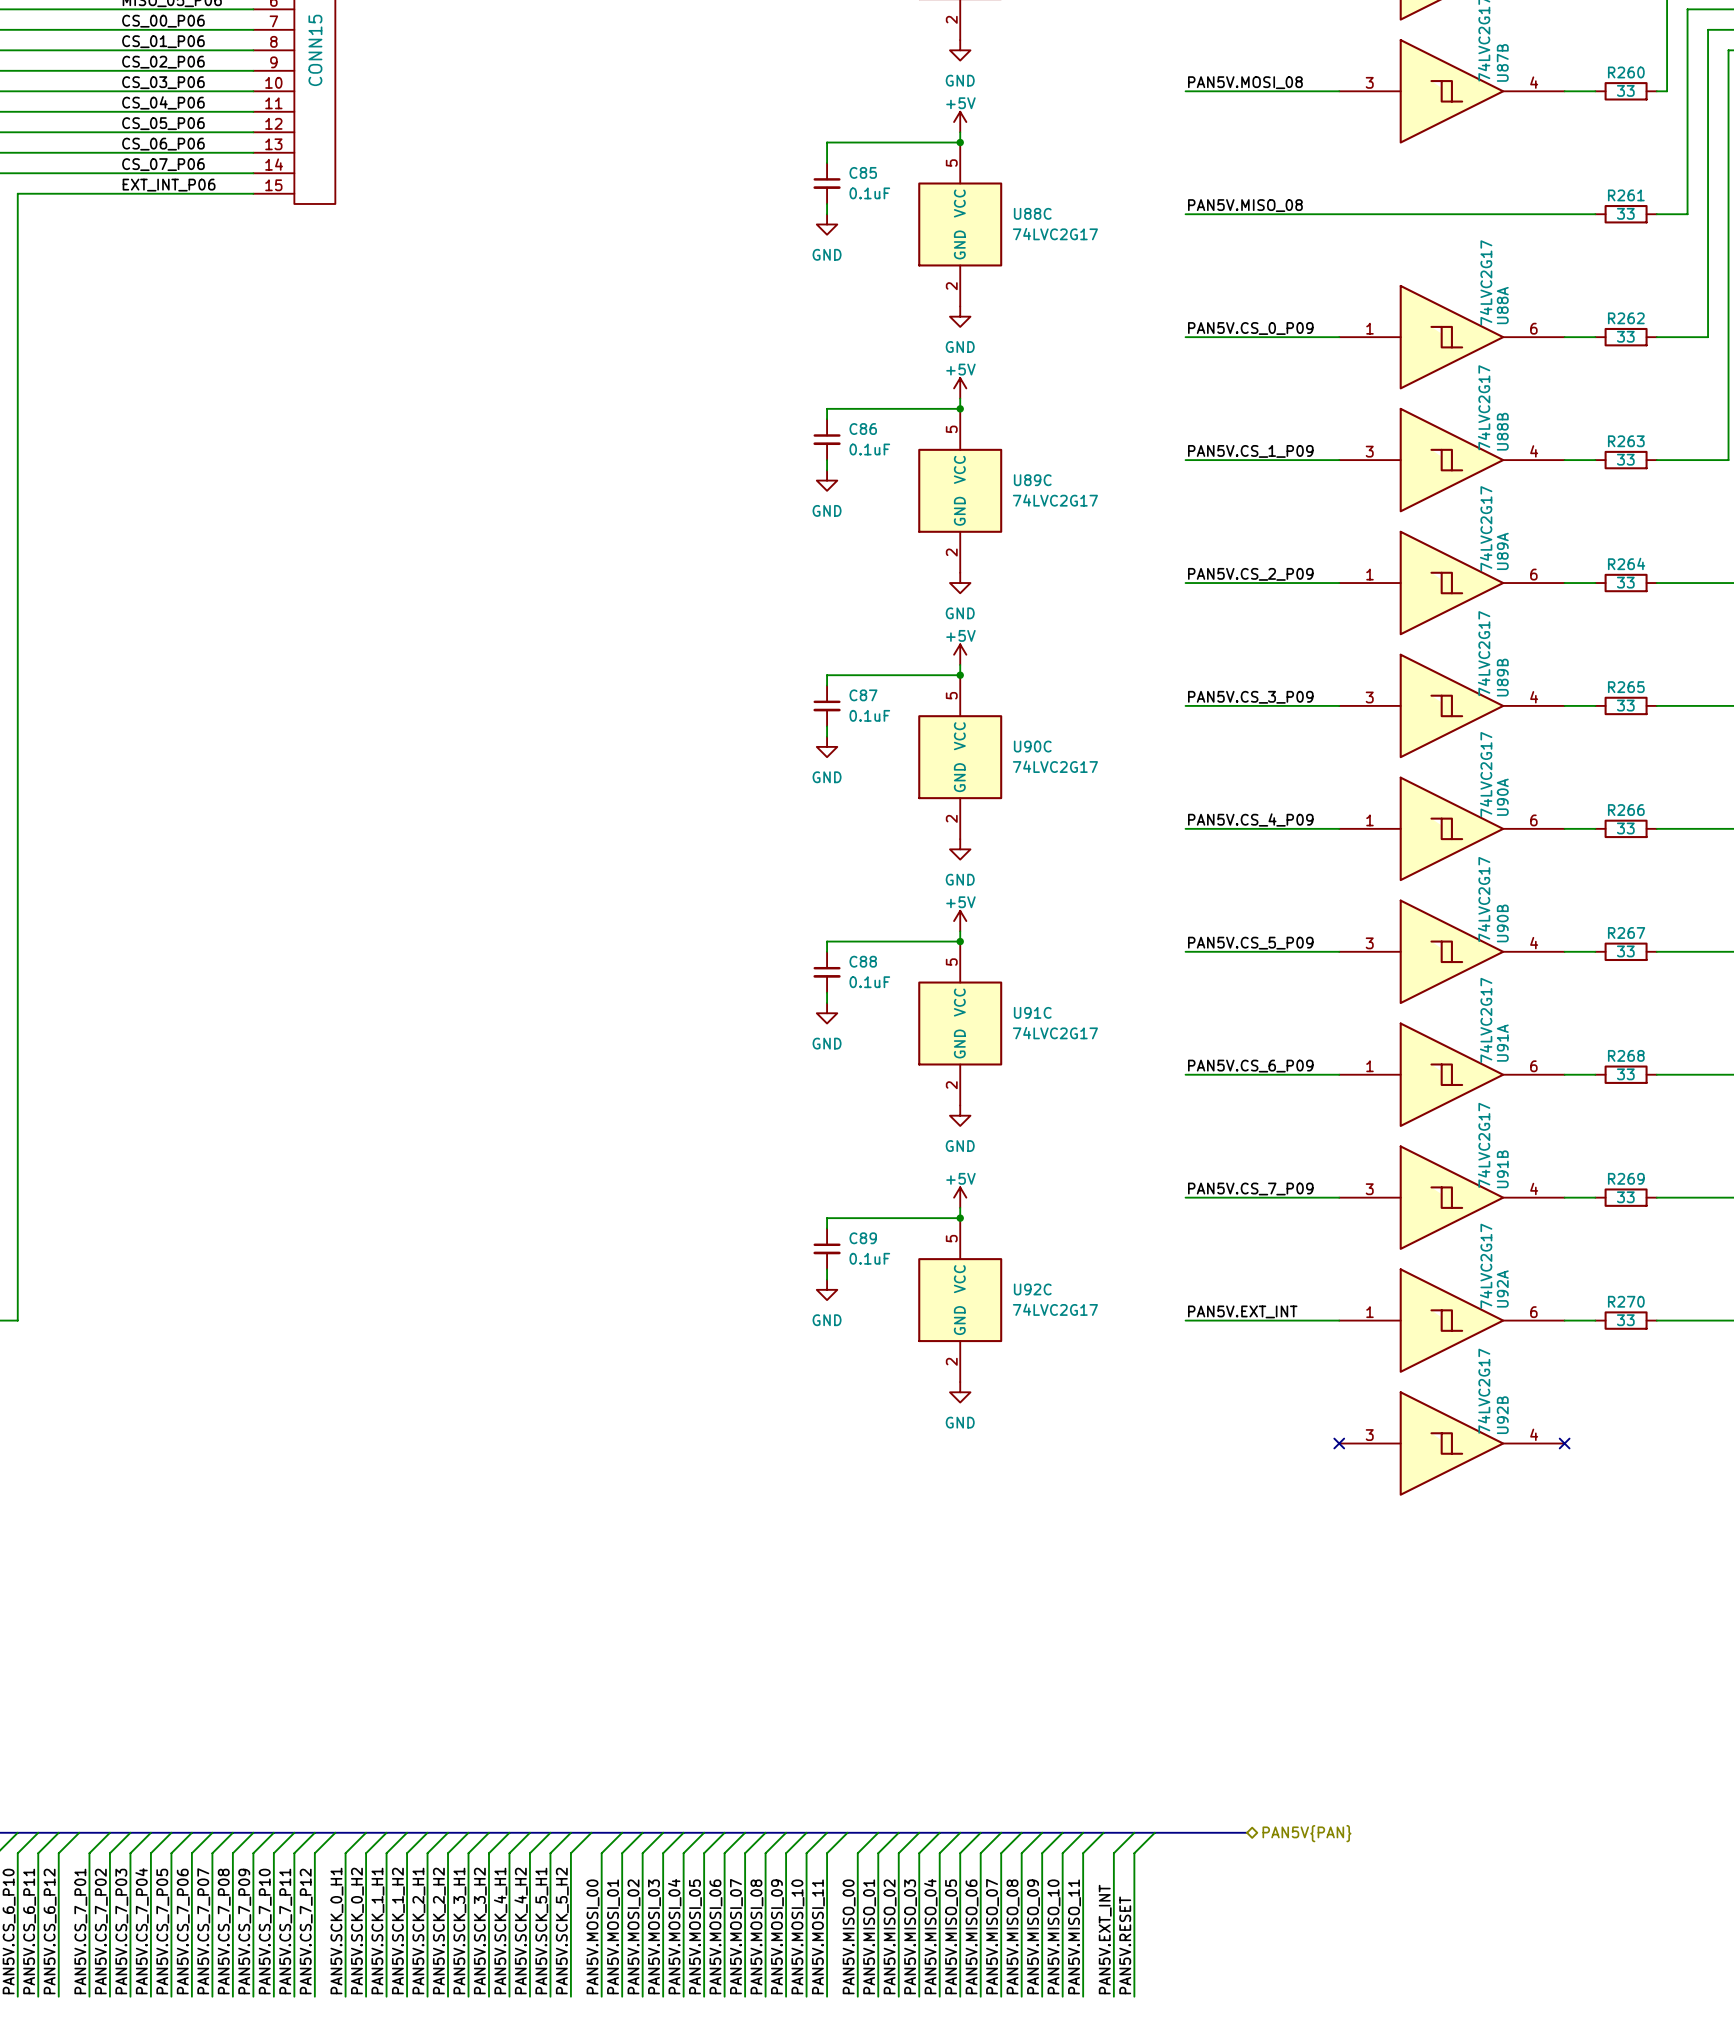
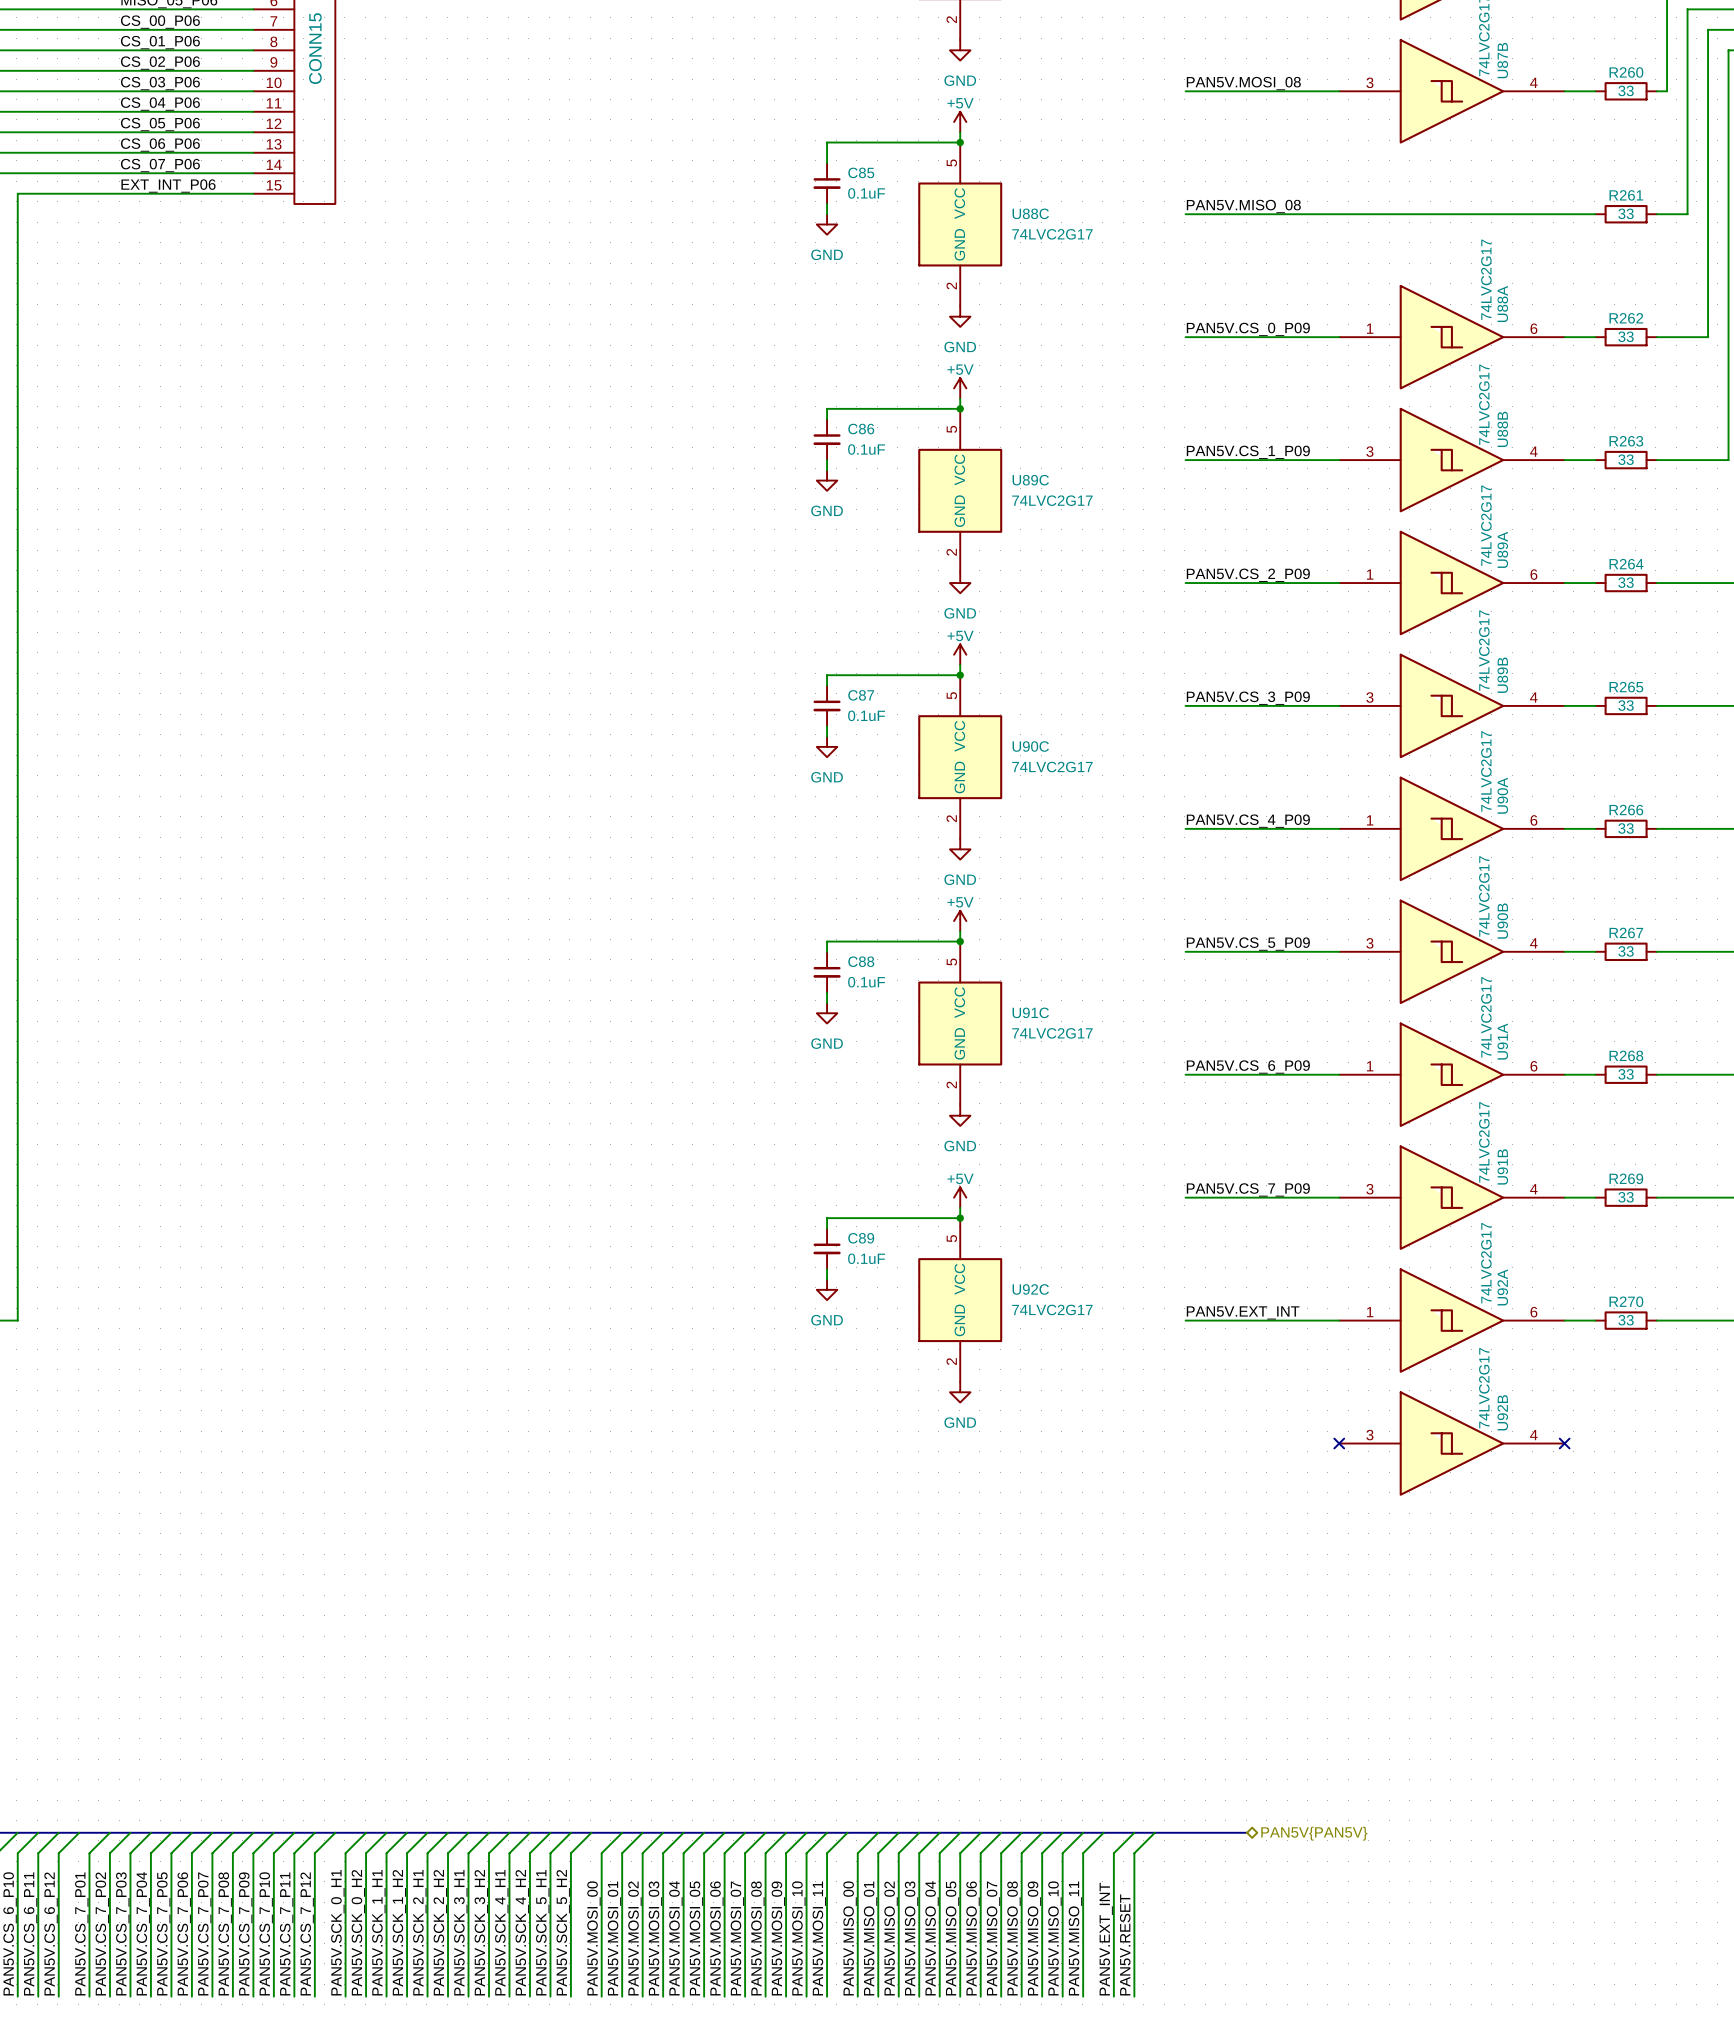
hierarchical label: PAN5V{PAN} (1306, 1833) -> PAN5V{PAN5V} (1314, 1833)

